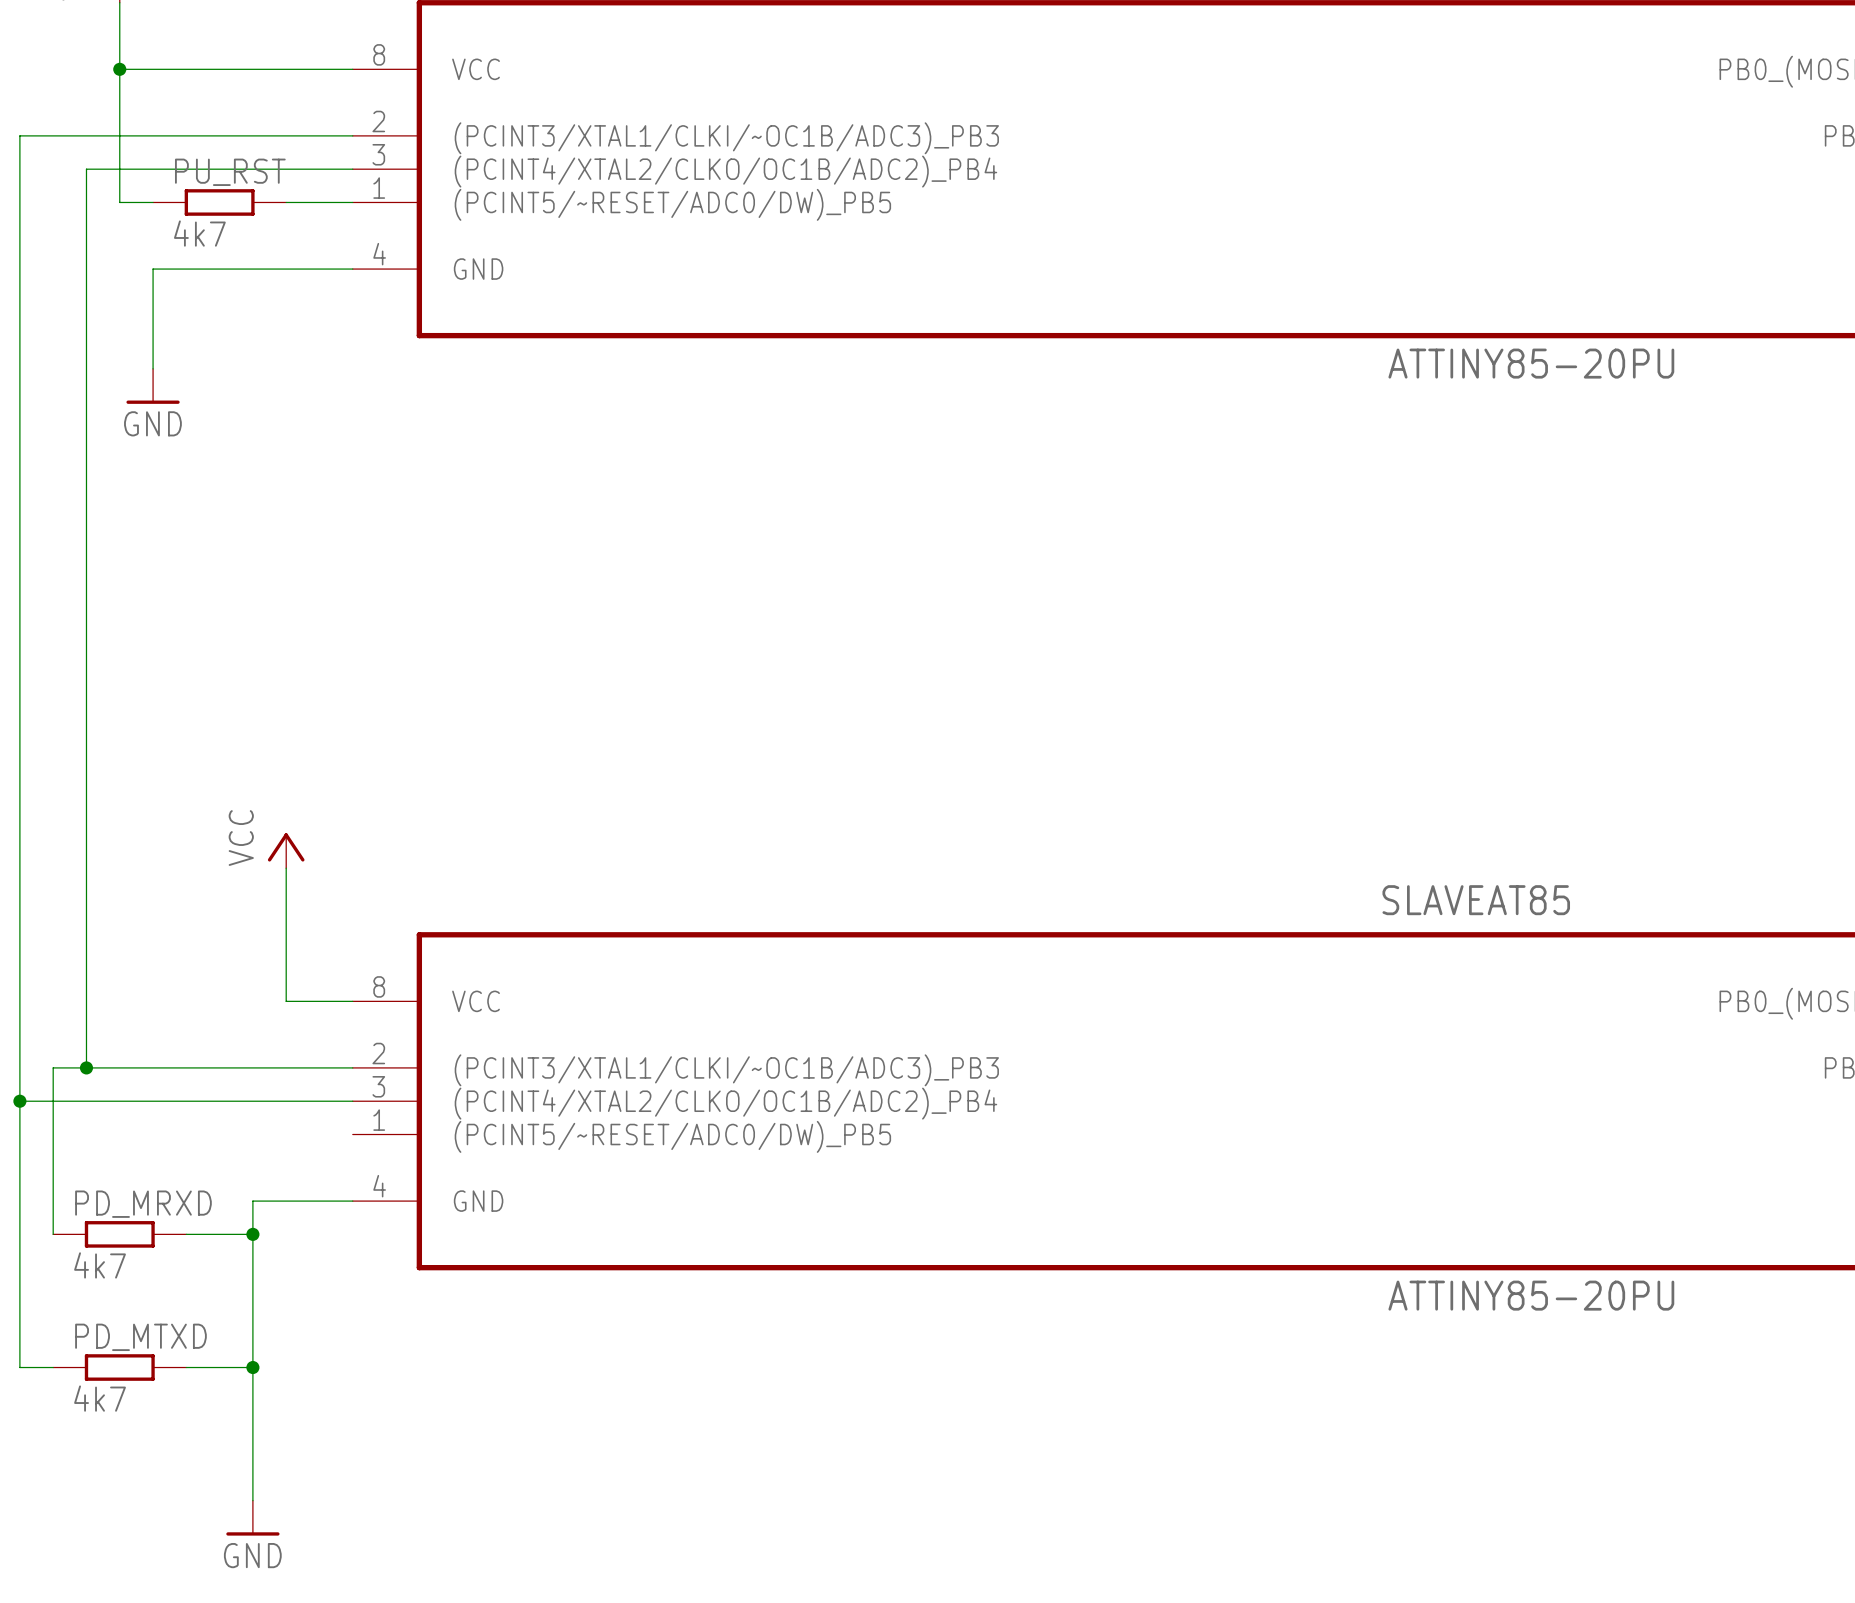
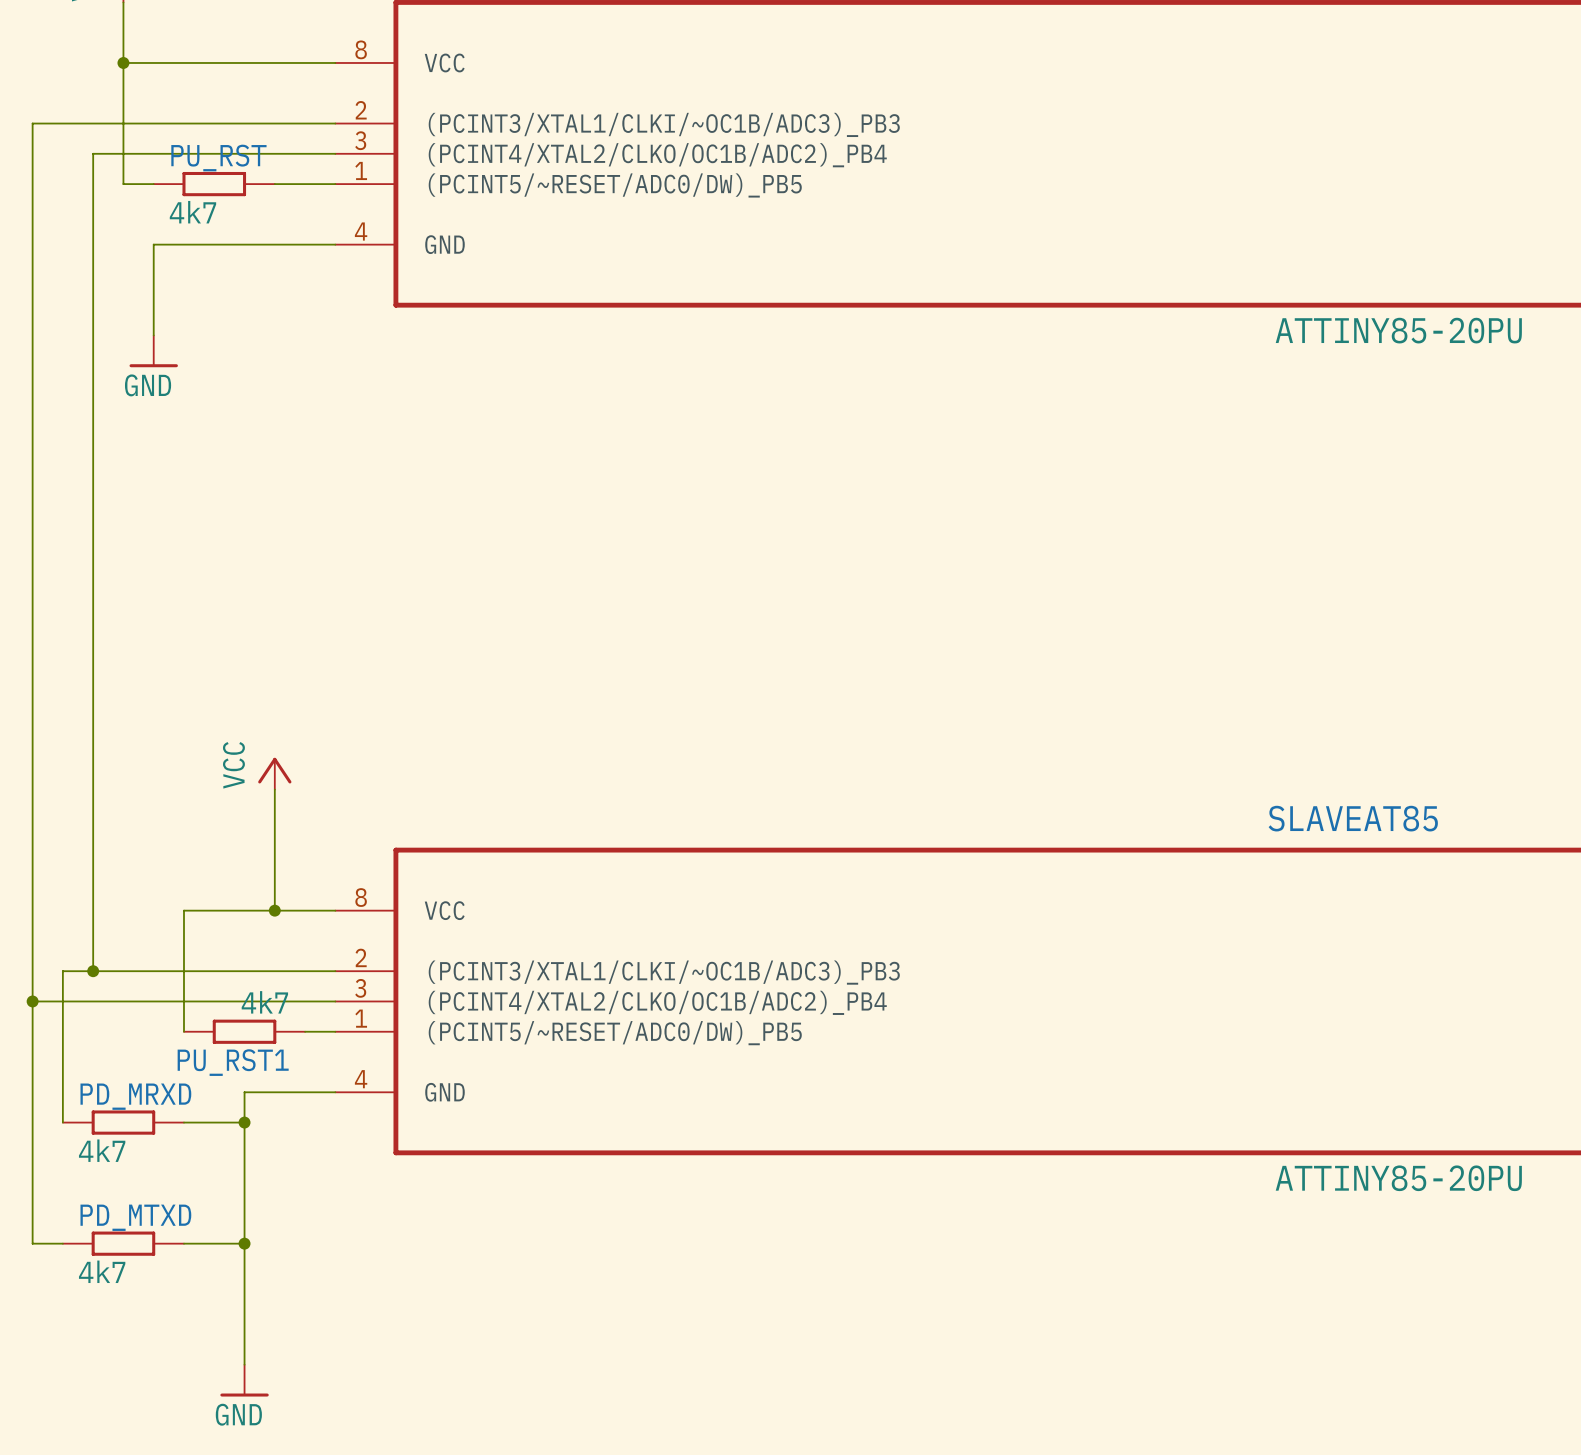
wire: none -> (274, 910) (183, 910) (183, 1031)
junction: none -> (274, 910)
PU_RST1: none -> 4k7 (244, 1031)
wire: none -> (305, 1031) (335, 1031)

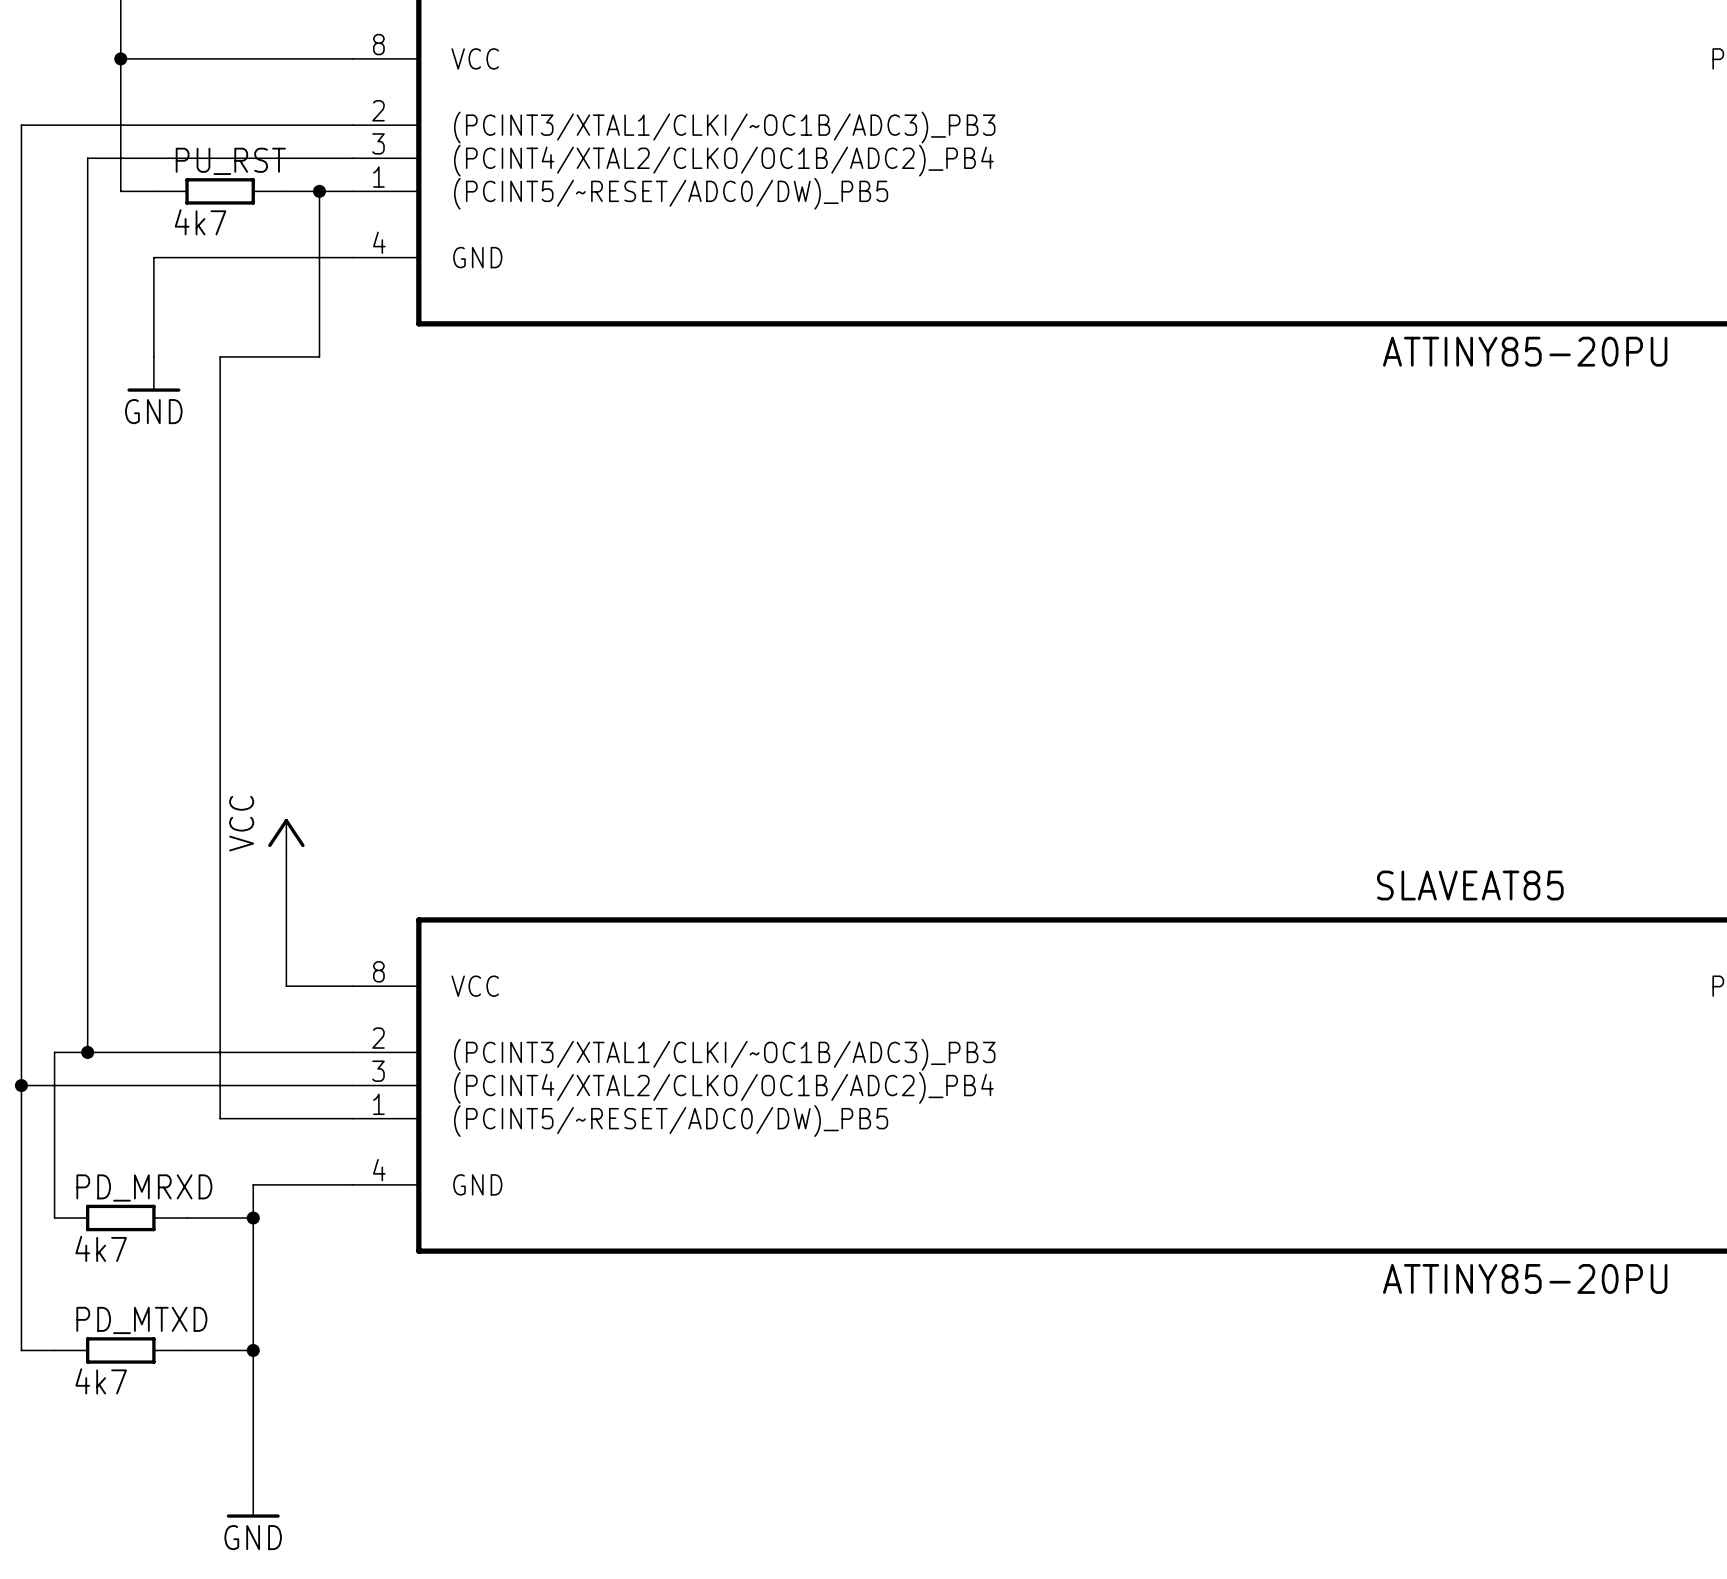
wire: none -> (319, 191) (319, 356) (220, 356) (220, 1118) (319, 1118)
junction: none -> (319, 191)
wire: (274, 910) (183, 910) (183, 1031) -> none
junction: (274, 910) -> none
PU_RST1: 4k7 (244, 1031) -> none

